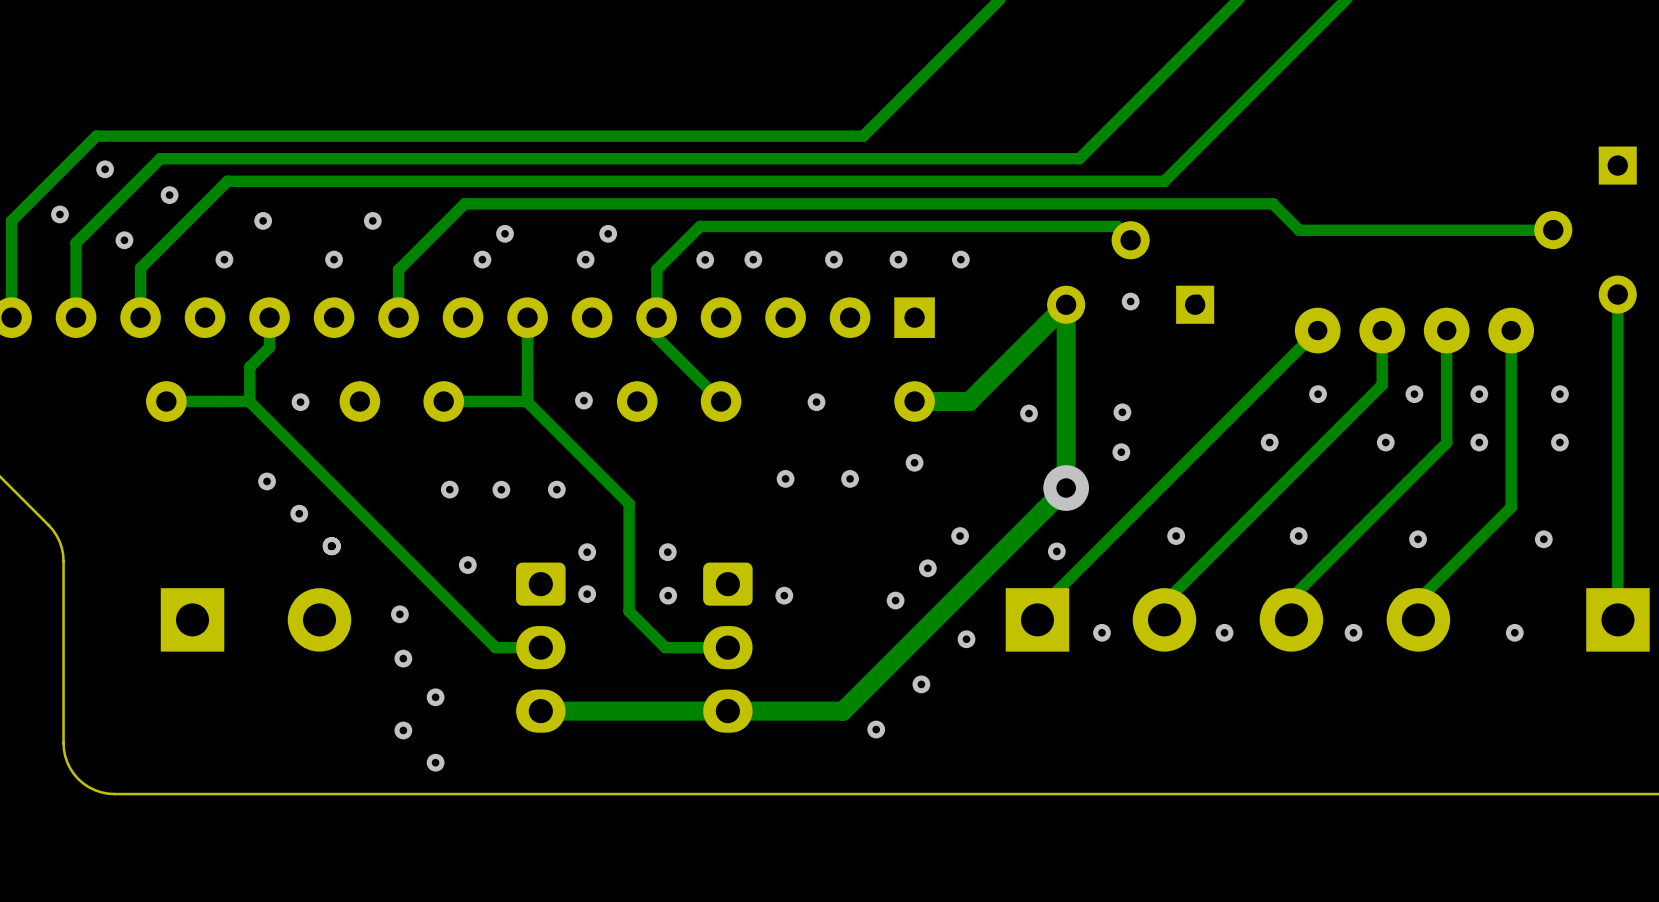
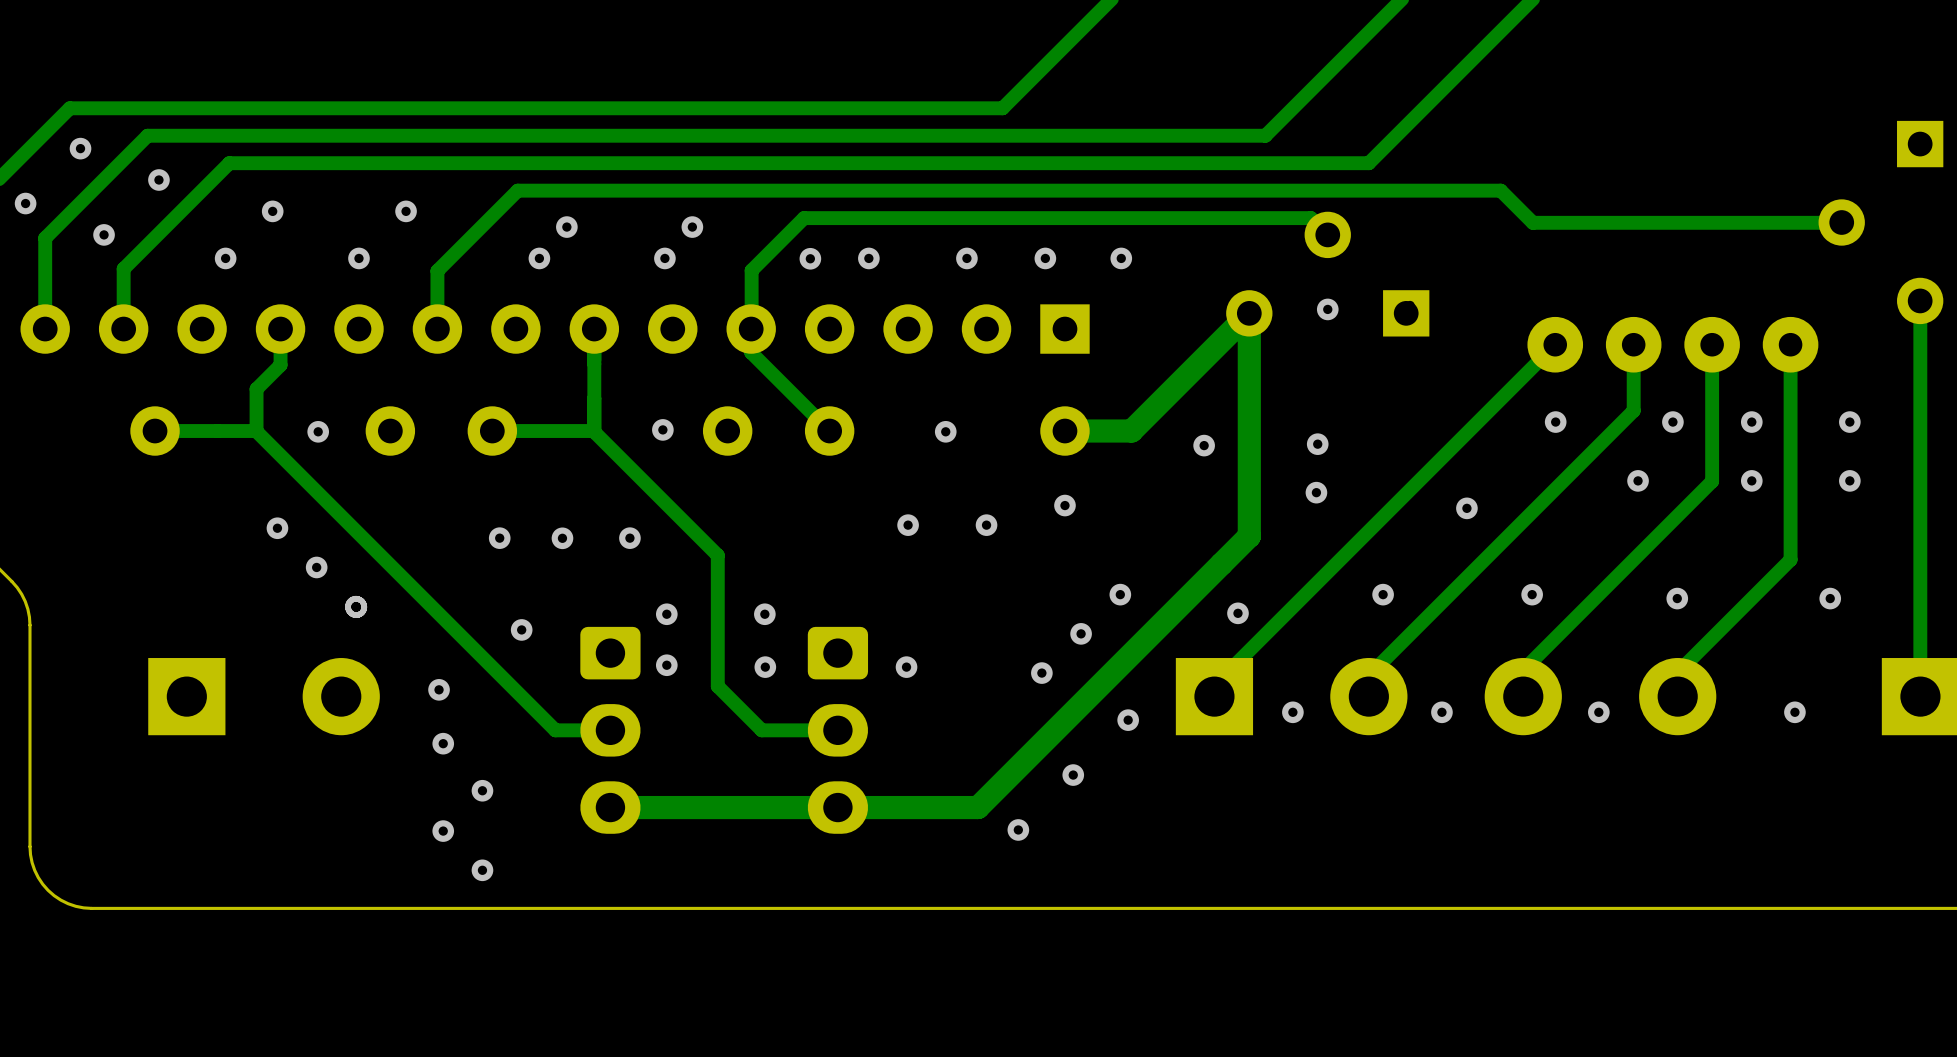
via position: (1269, 442) -> (1466, 508)
via: (1066, 488) -> none

